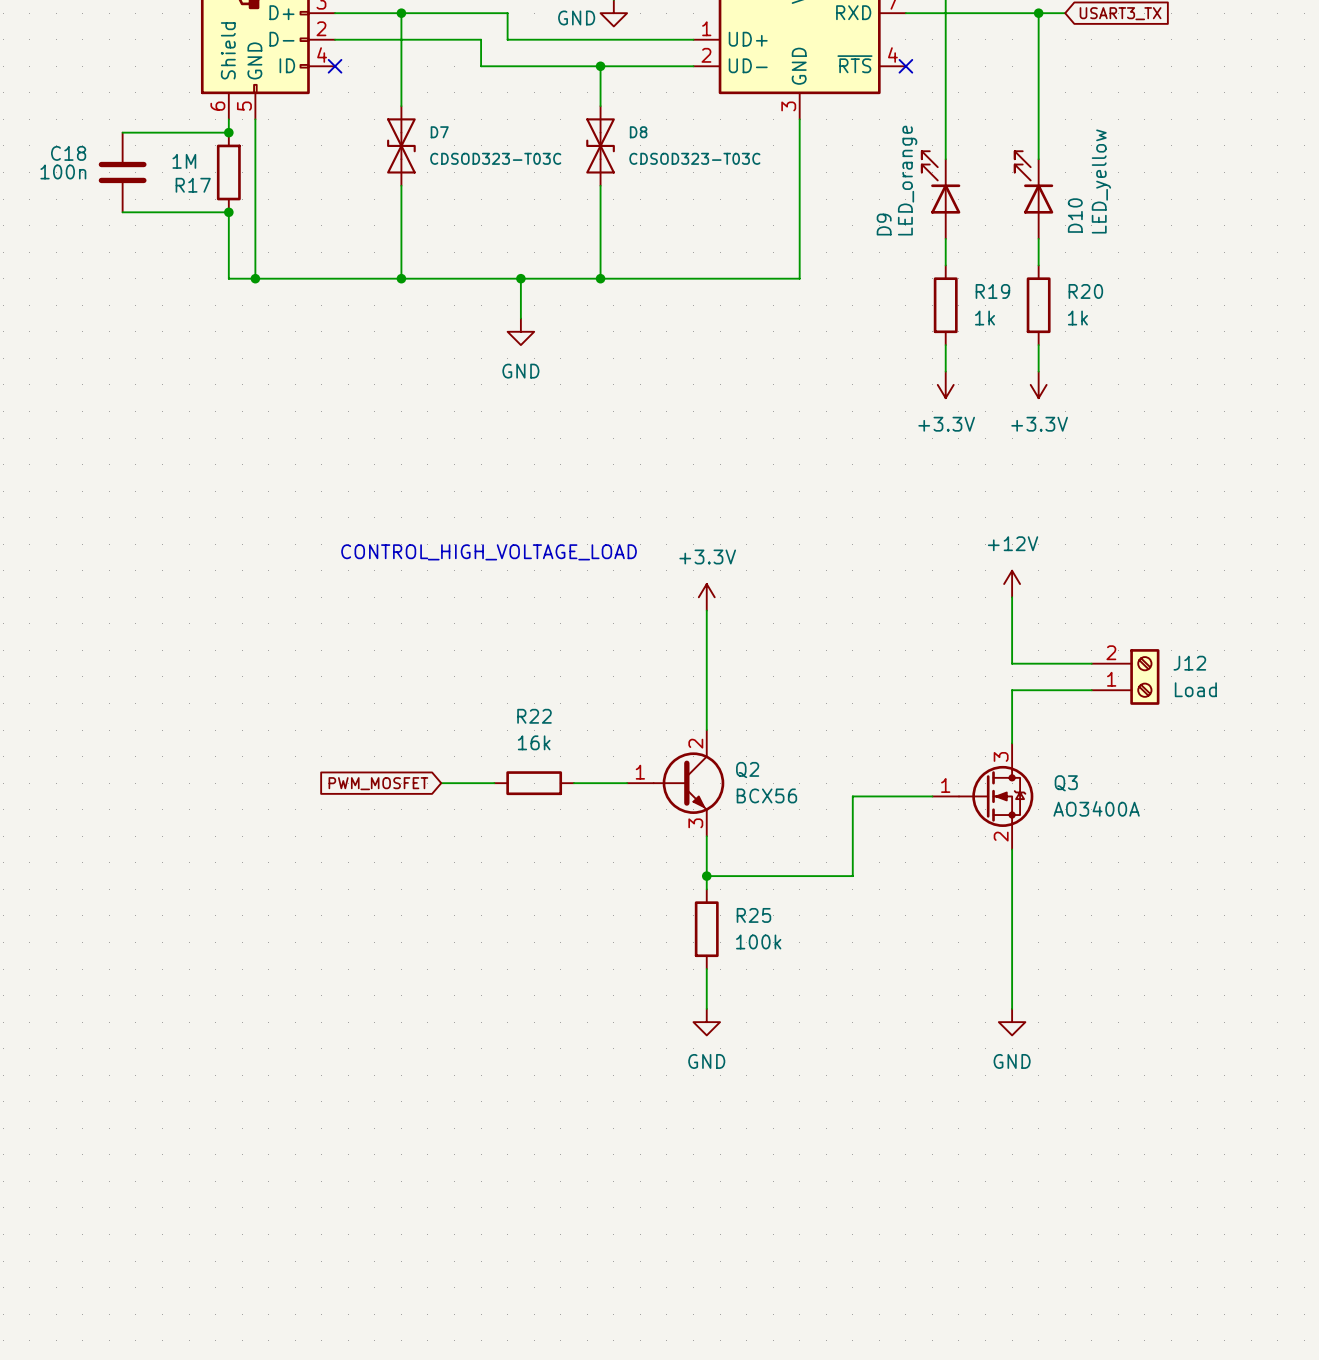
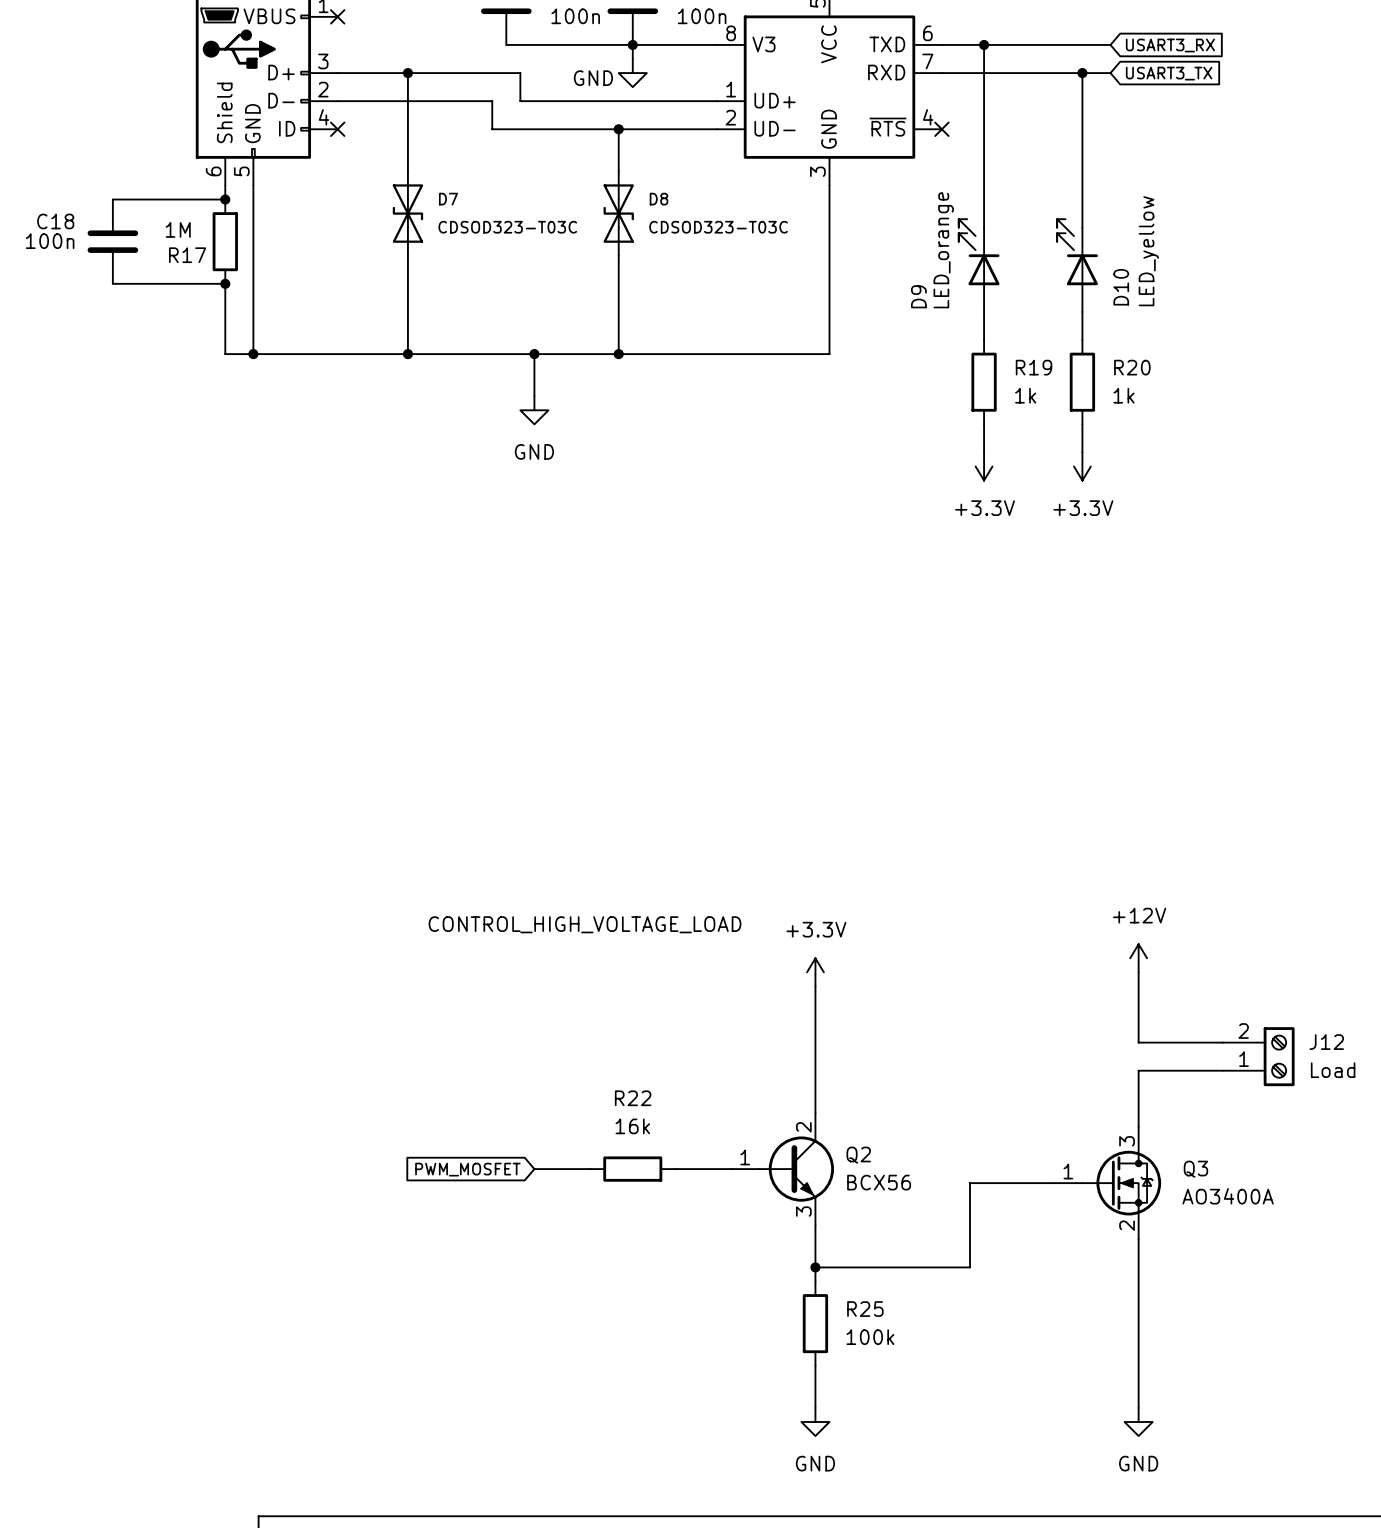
text: CONTROL_HIGH_VOLTAGE_LOAD (489, 552) -> none
power symbol: +12V (1012, 584) -> none
power symbol: +3.3V (706, 597) -> none
wire: (1012, 597) (1012, 663) (1091, 663) -> none
wire: (706, 610) (706, 730) -> none
J12 position: (1125, 676) -> (1258, 1056)
wire: (1091, 690) (1012, 690) (1012, 743) -> none
global label: PWM_MOSFET (378, 783) -> none
wire: (441, 783) (494, 783) -> none
R22 position: (534, 783) -> (632, 1169)
wire: (574, 783) (627, 783) -> none
Q2 position: (675, 783) -> (782, 1169)
wire: (932, 796) (852, 796) (852, 876) (706, 876) -> none
Q3 position: (982, 796) -> (1107, 1183)
text: none -> CONTROL_HIGH_VOLTAGE_LOAD (585, 924)
wire: (706, 836) (706, 889) -> none
wire: (1012, 849) (1012, 1008) -> none
power symbol: none -> +12V (1138, 958)
power symbol: none -> +3.3V (815, 972)
wire: none -> (1138, 972) (1138, 1042) (1222, 1042)
junction: (706, 876) -> none
wire: none -> (815, 986) (815, 1112)
R25 position: (706, 929) -> (815, 1323)
wire: none -> (1222, 1070) (1138, 1070) (1138, 1126)
wire: (706, 969) (706, 1008) -> none
power symbol: GND (706, 1022) -> none
power symbol: GND (1012, 1022) -> none
wire: none -> (534, 1169) (590, 1169)
wire: none -> (674, 1169) (731, 1169)
global label: none -> PWM_MOSFET (467, 1169)
wire: none -> (1054, 1183) (970, 1183) (970, 1267) (815, 1267)
wire: none -> (815, 1225) (815, 1281)
wire: none -> (1138, 1239) (1138, 1407)
junction: none -> (815, 1267)
wire: none -> (815, 1365) (815, 1407)
power symbol: none -> GND (815, 1421)
power symbol: none -> GND (1138, 1421)

